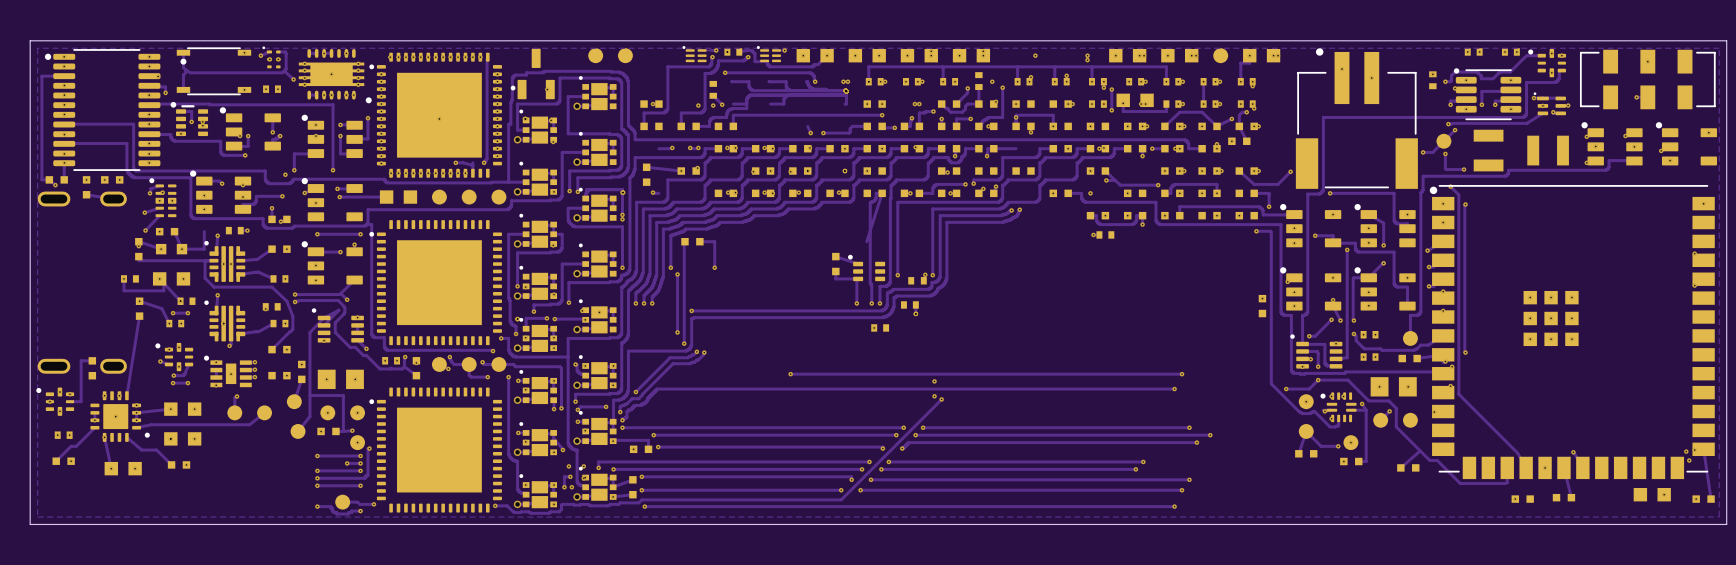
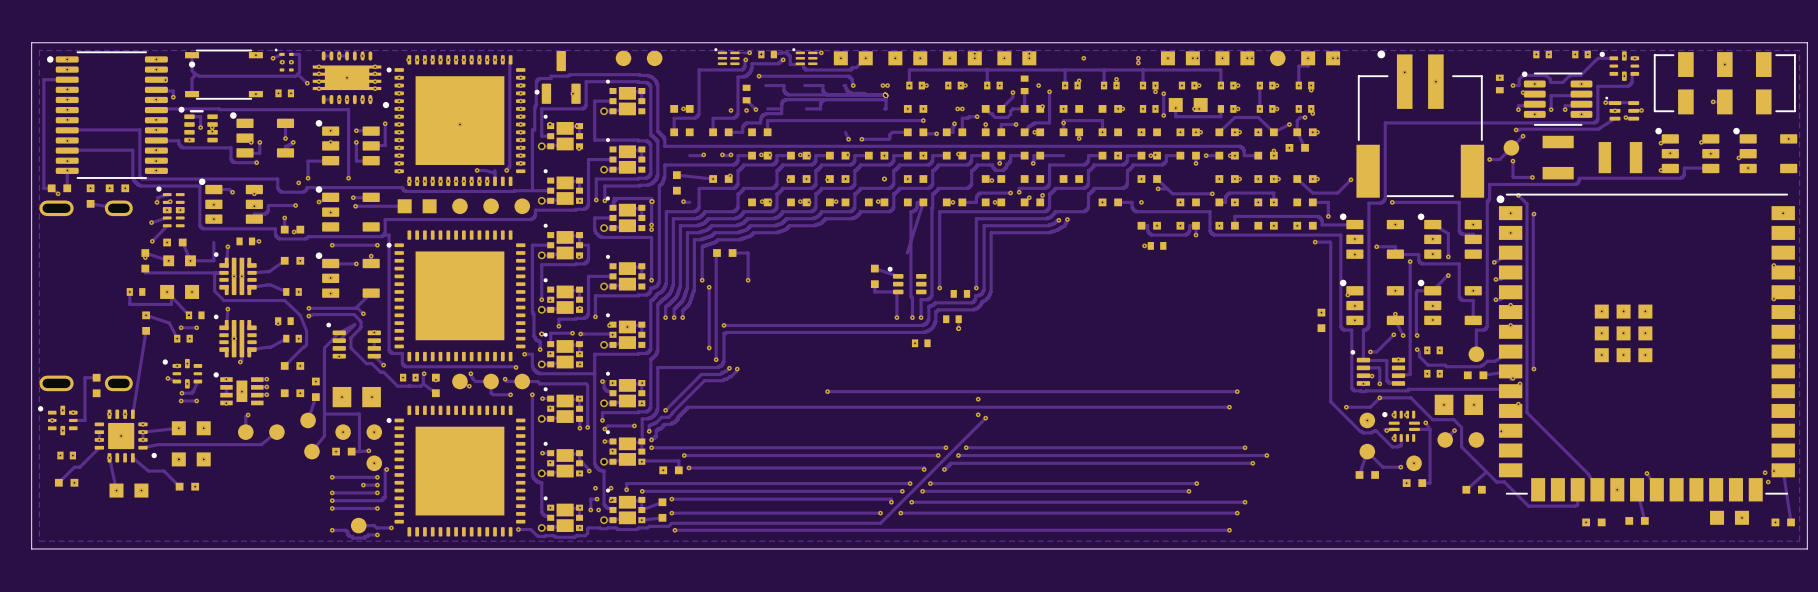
via: (925, 274) -> none

